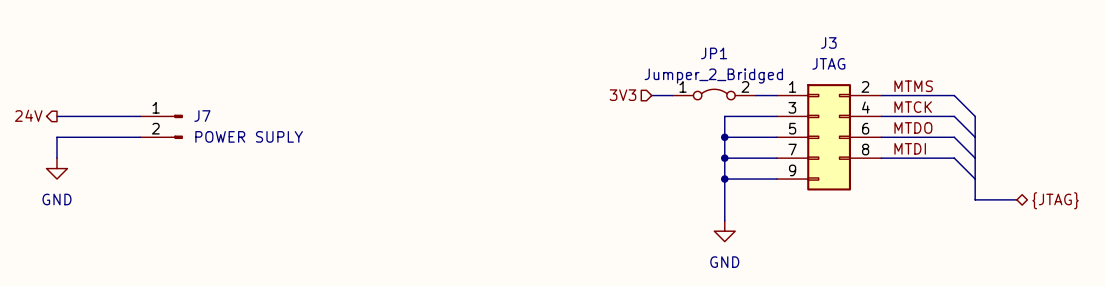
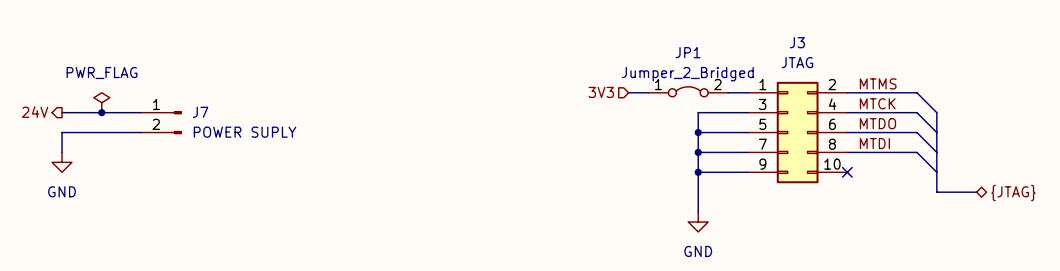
J3 symbol: [776, 84, 882, 191] -> [747, 81, 848, 184]
power symbol: none -> PWR_FLAG (101, 102)
junction: none -> (101, 112)
no-connect mark: none -> (847, 172)

